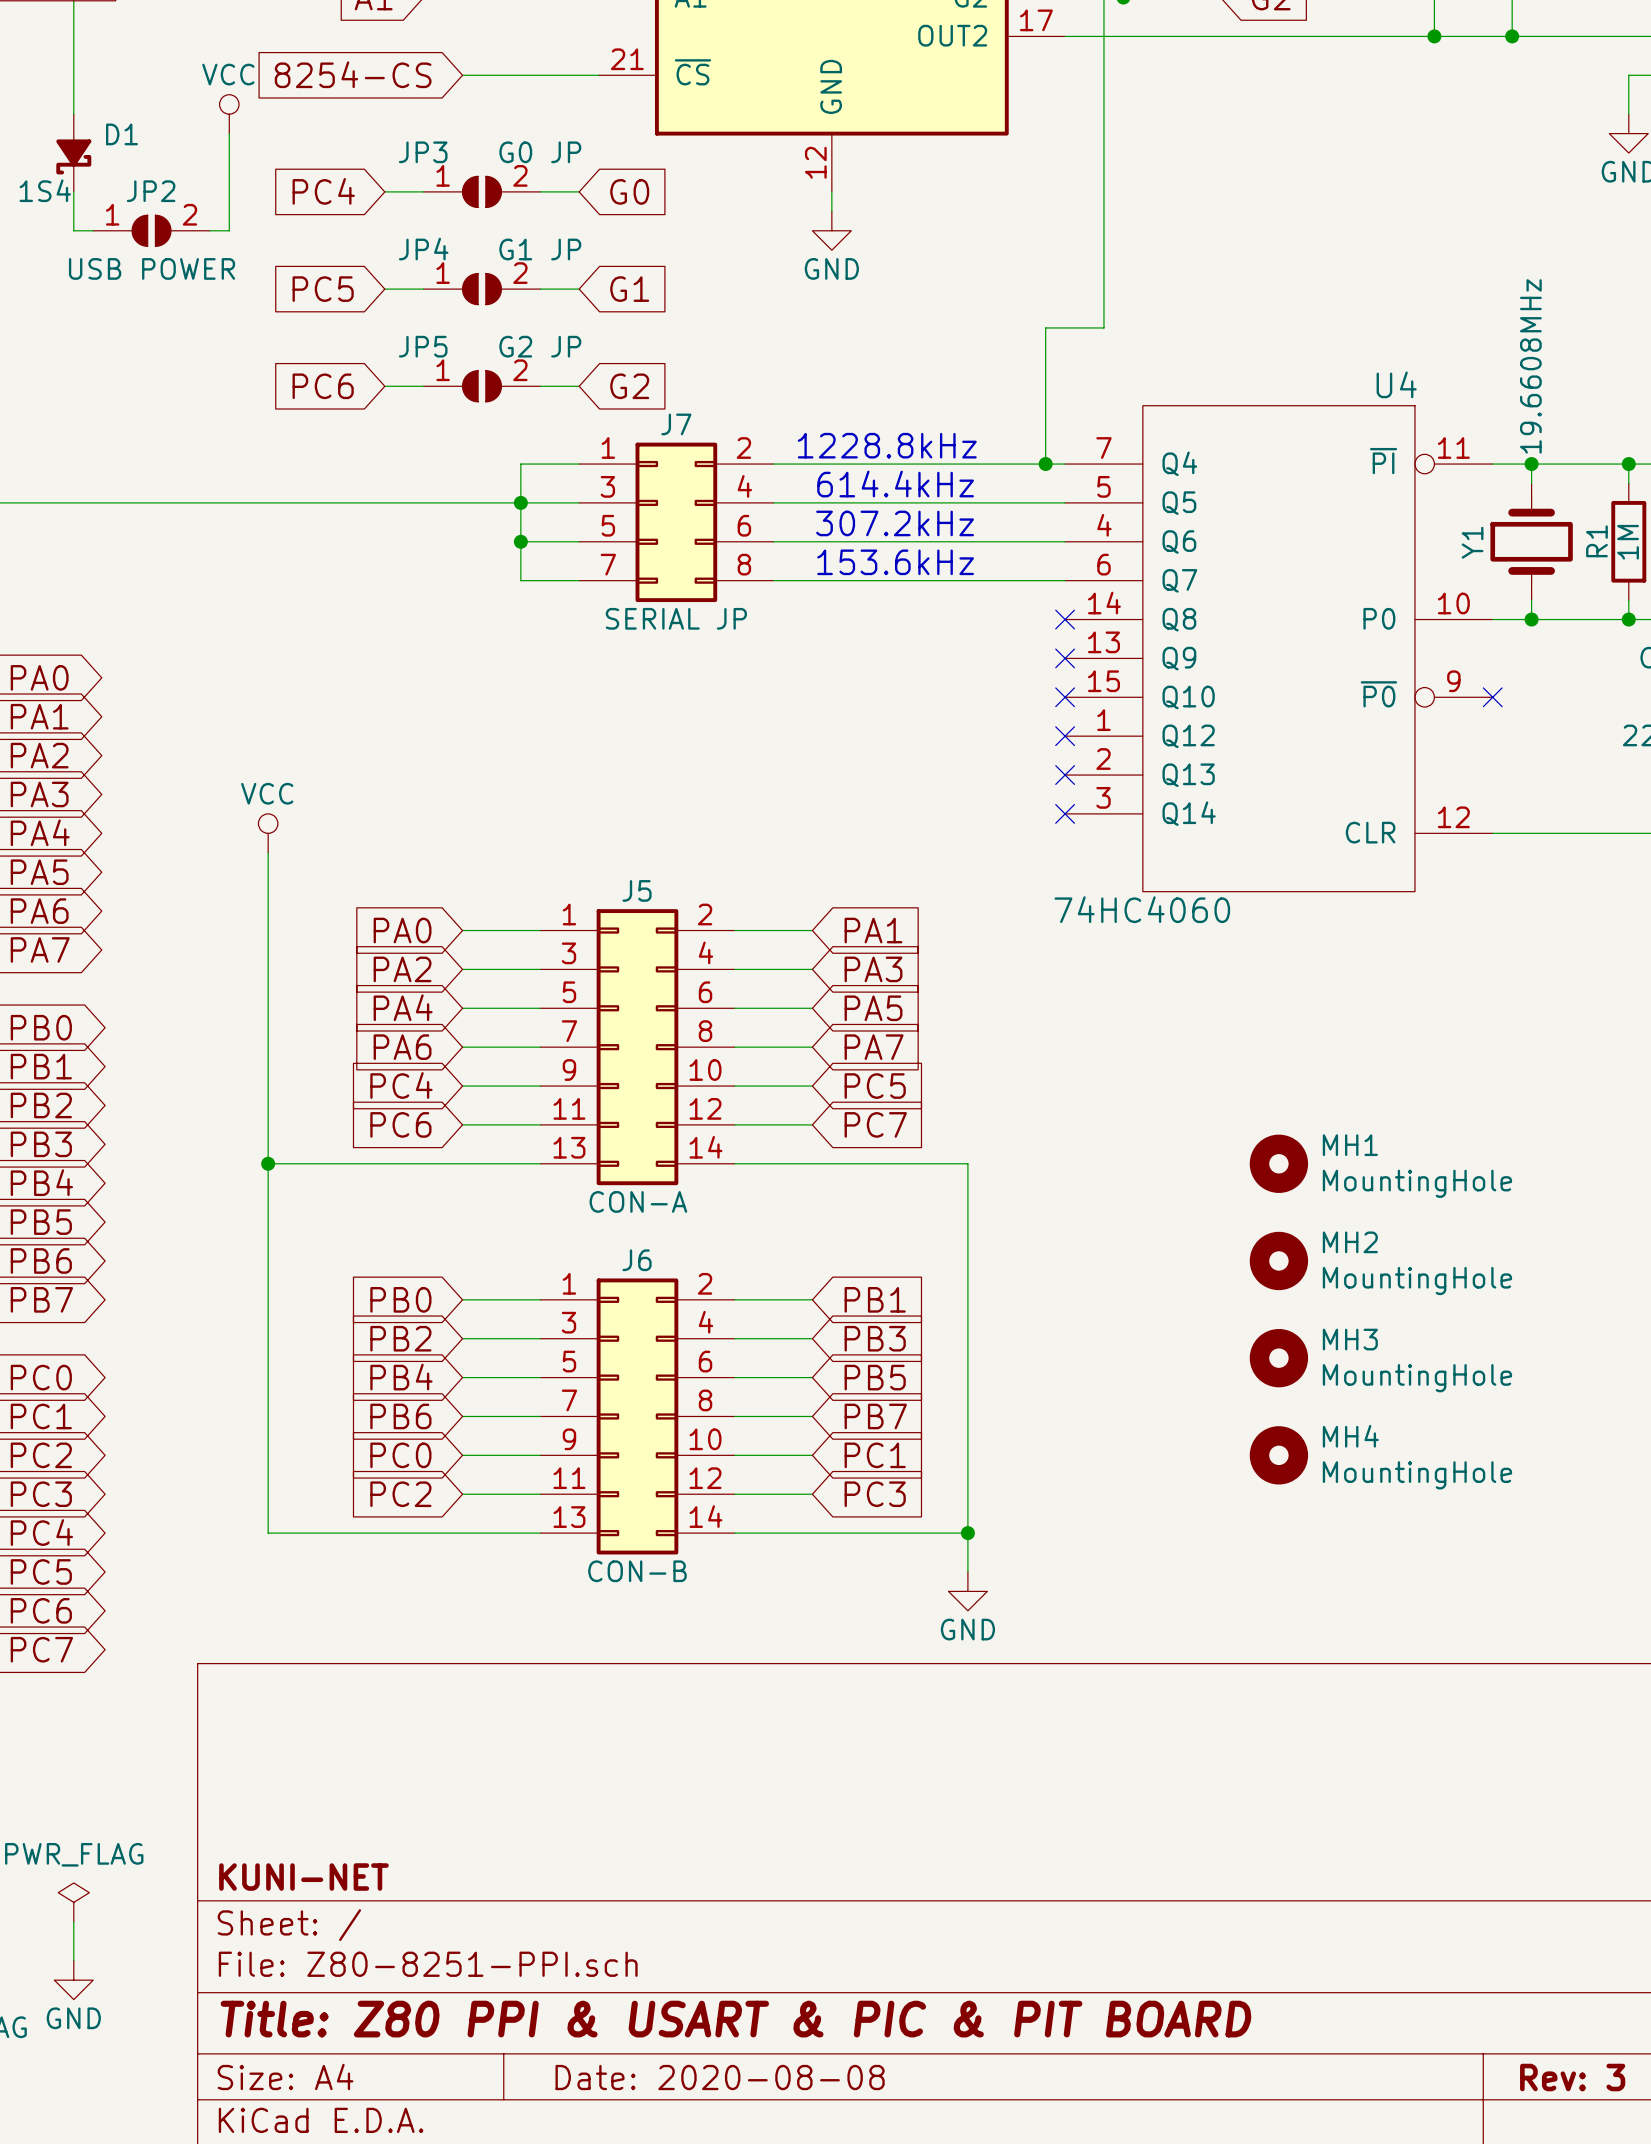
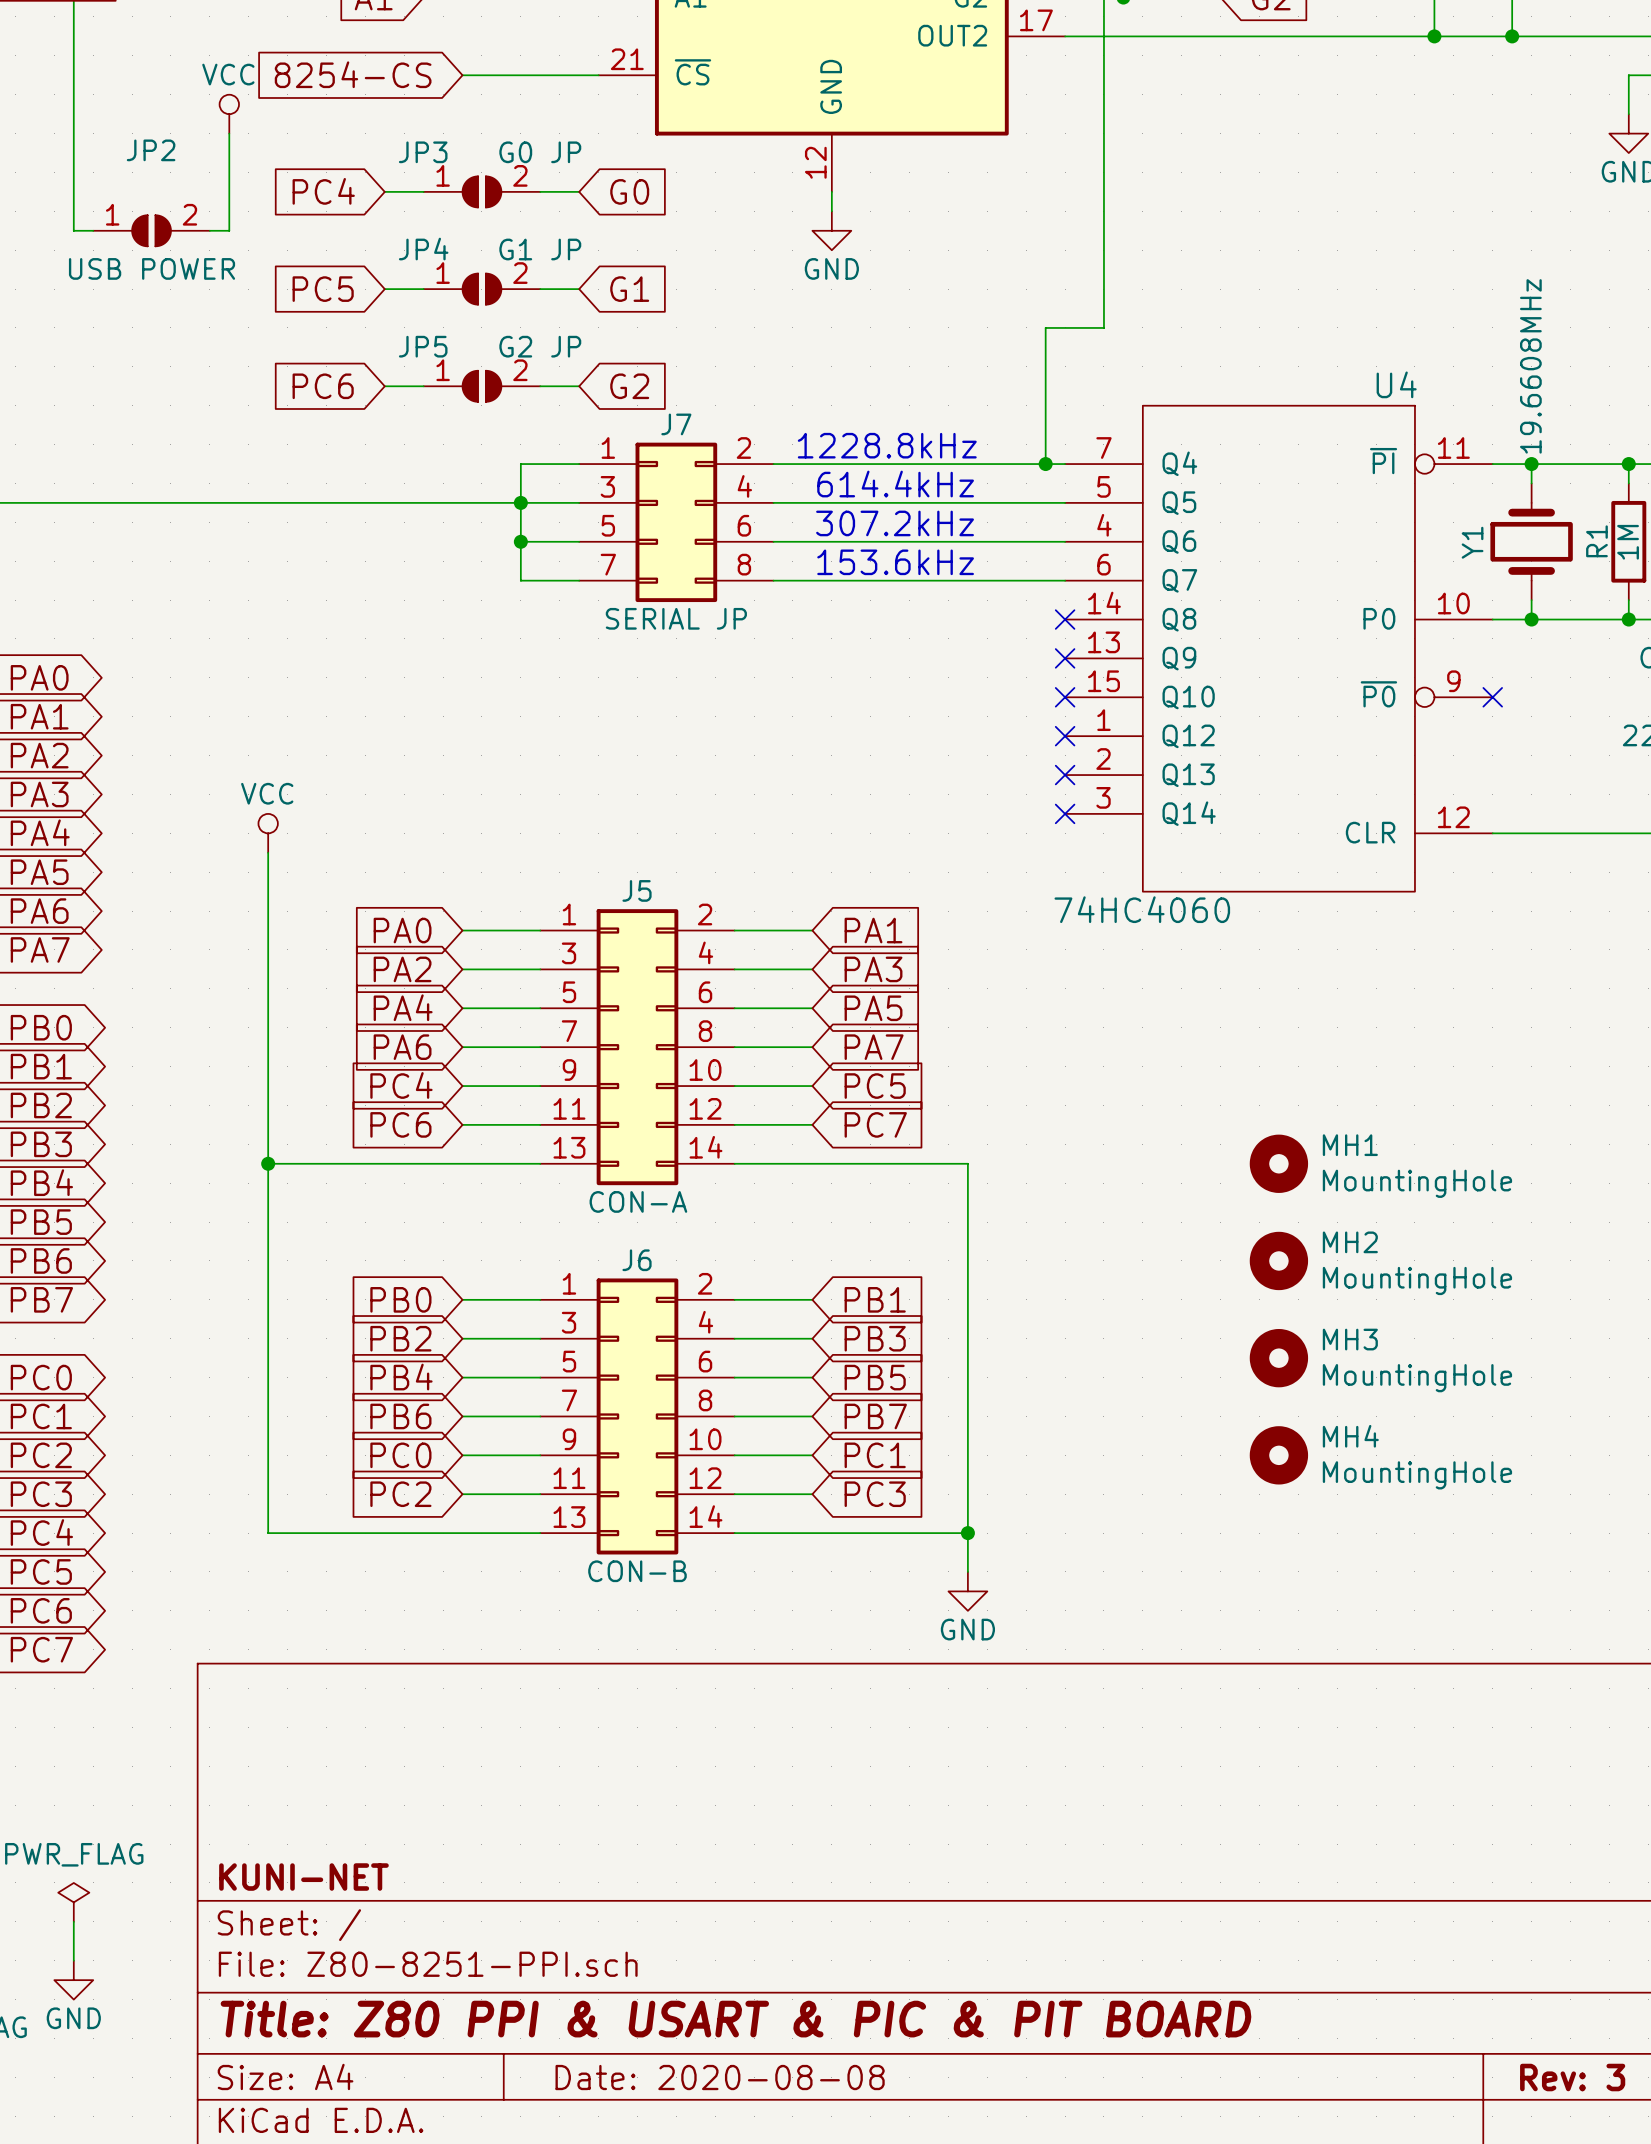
D1: 1S4 (73, 153) -> none
JP2 name position: JP2 (151, 191) -> JP2 (151, 150)

